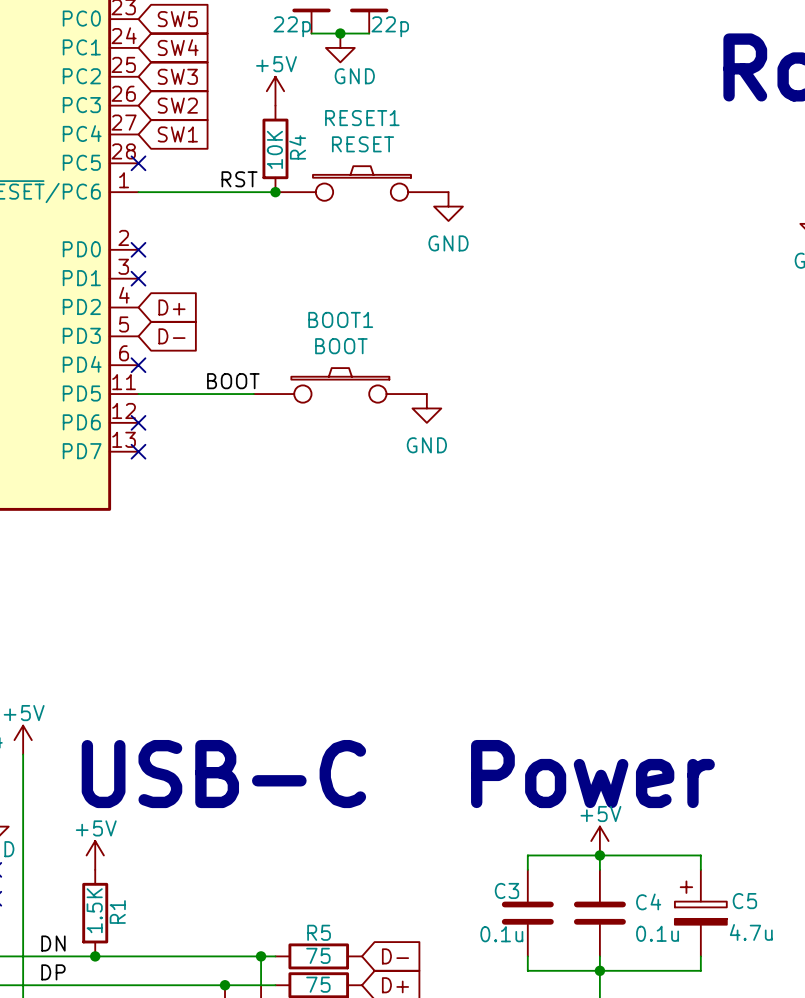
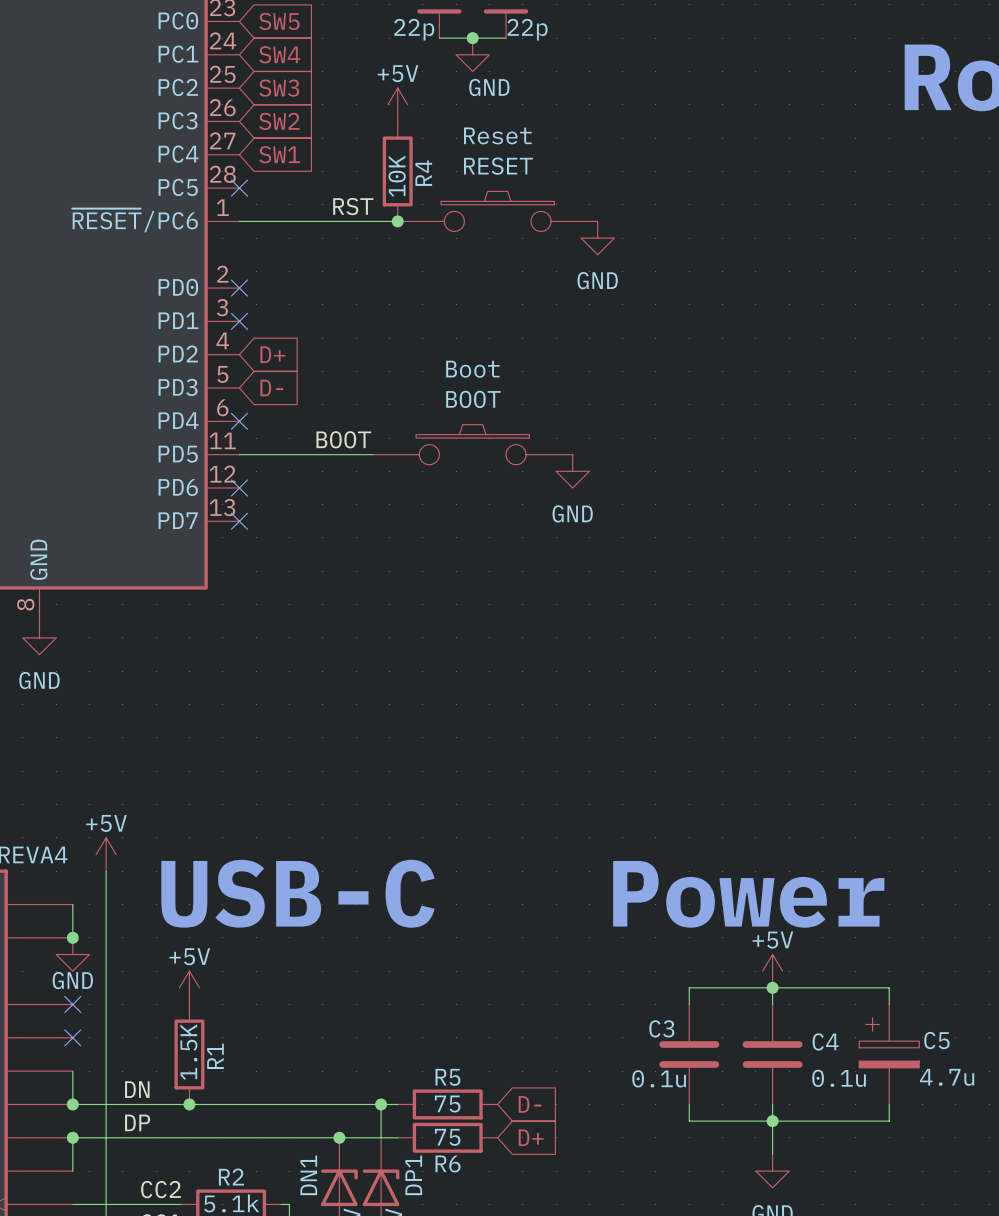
RESET1 name: RESET1 (362, 118) -> Reset (497, 135)
BOOT1 name: BOOT1 (340, 319) -> Boot (472, 369)

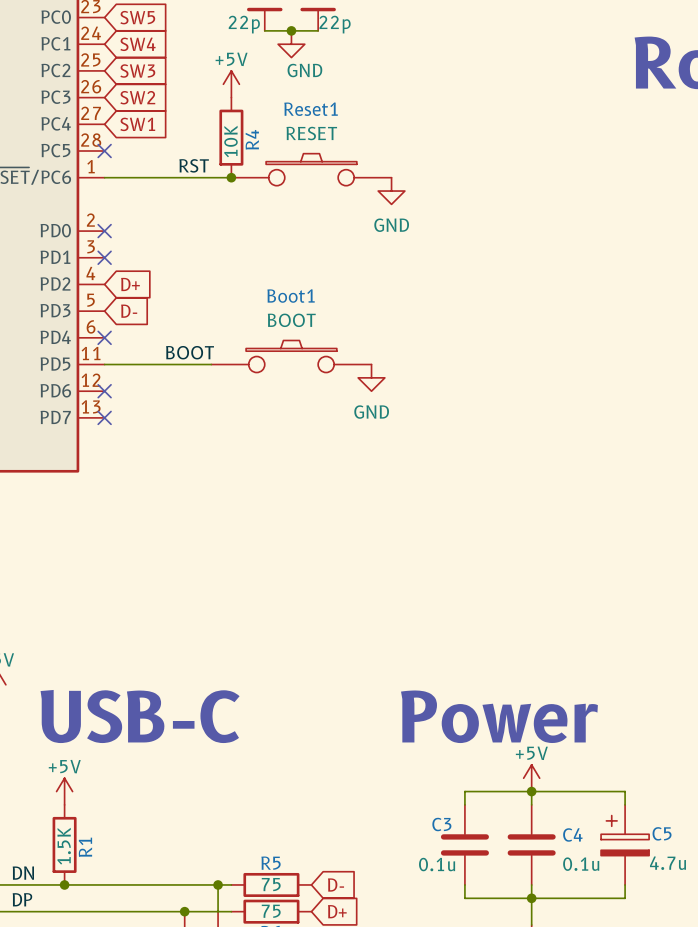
Reset name: Reset (497, 135) -> Reset1 (311, 109)
Boot name: Boot (472, 369) -> Boot1 (291, 296)

